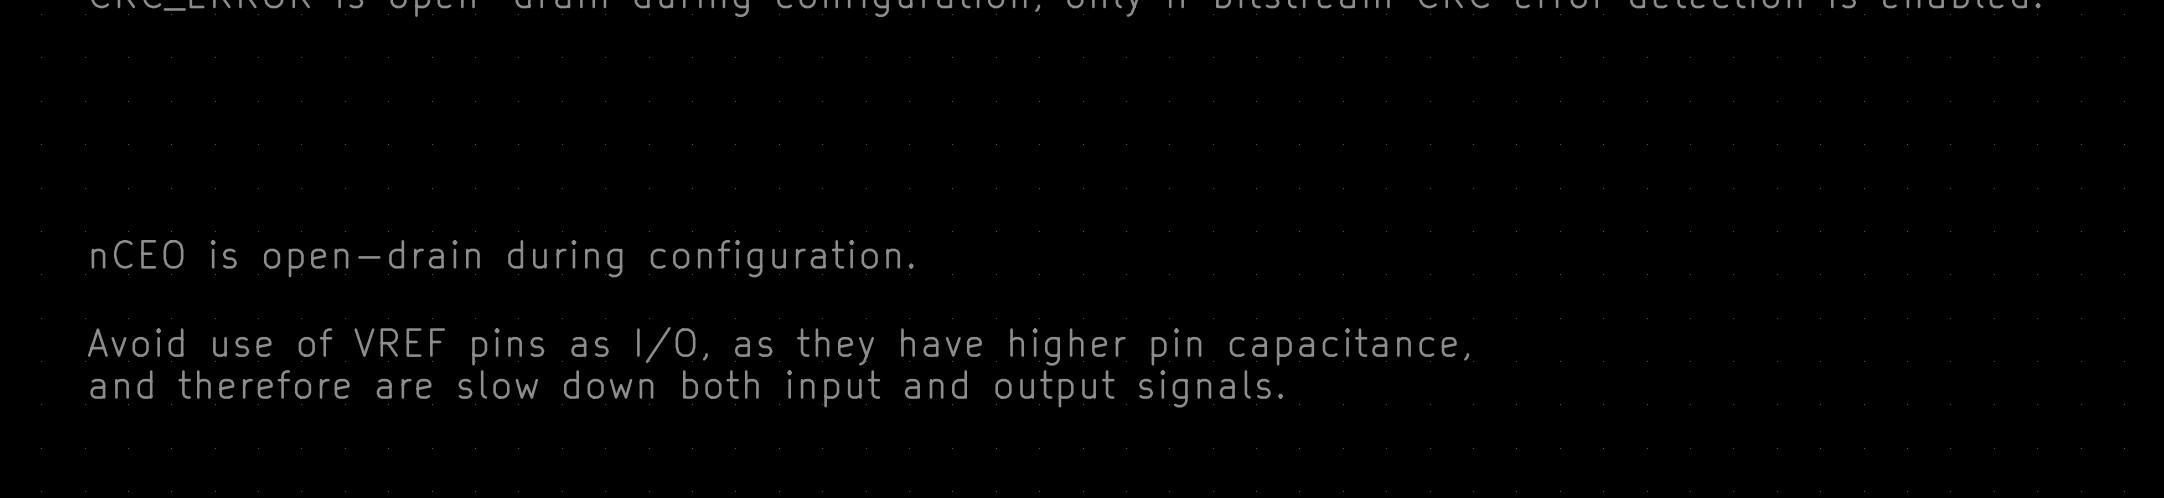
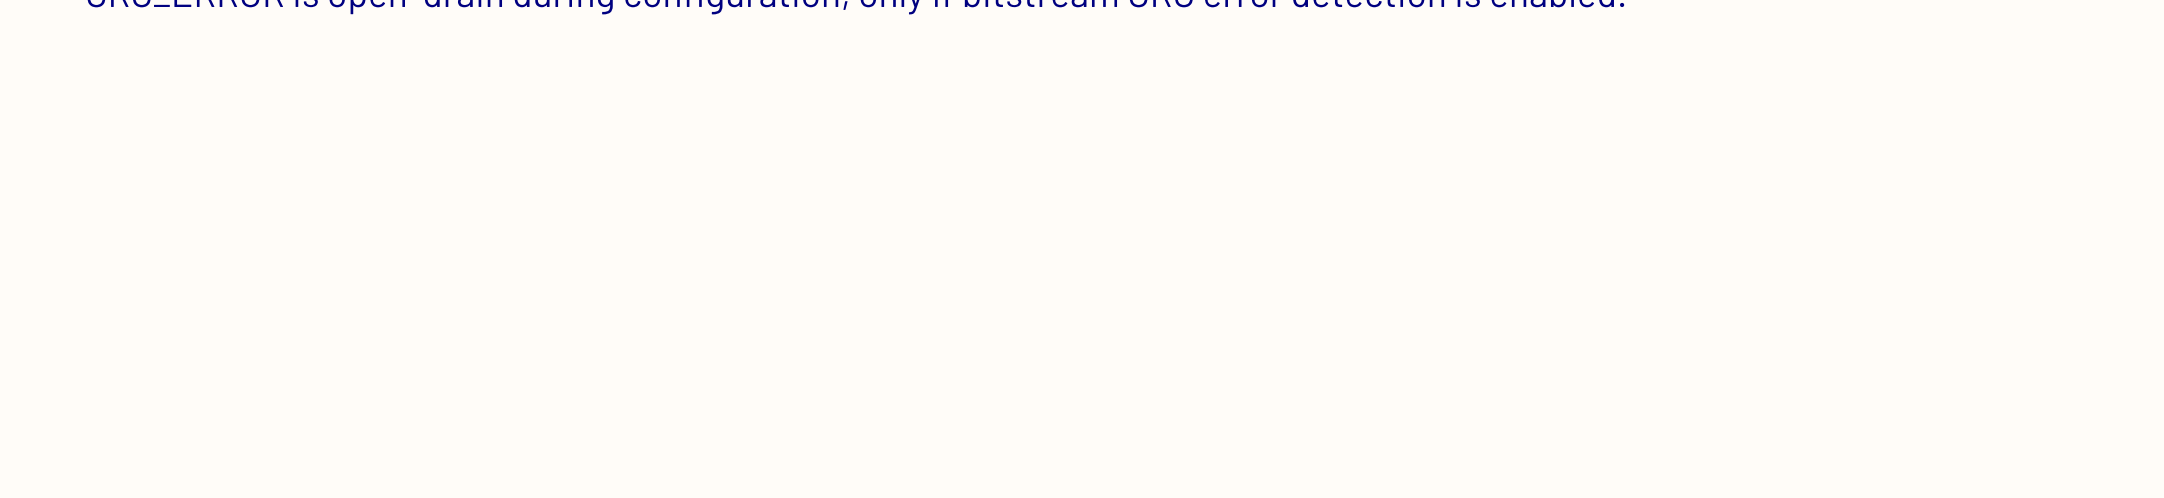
text: nCEO is open-drain during configuration. (502, 258) -> none
text: Avoid use of VREF pins as I/O, as they have higher pin capacitance, (778, 346) -> none
text: and therefore are slow down both input and output signals. (686, 388) -> none

